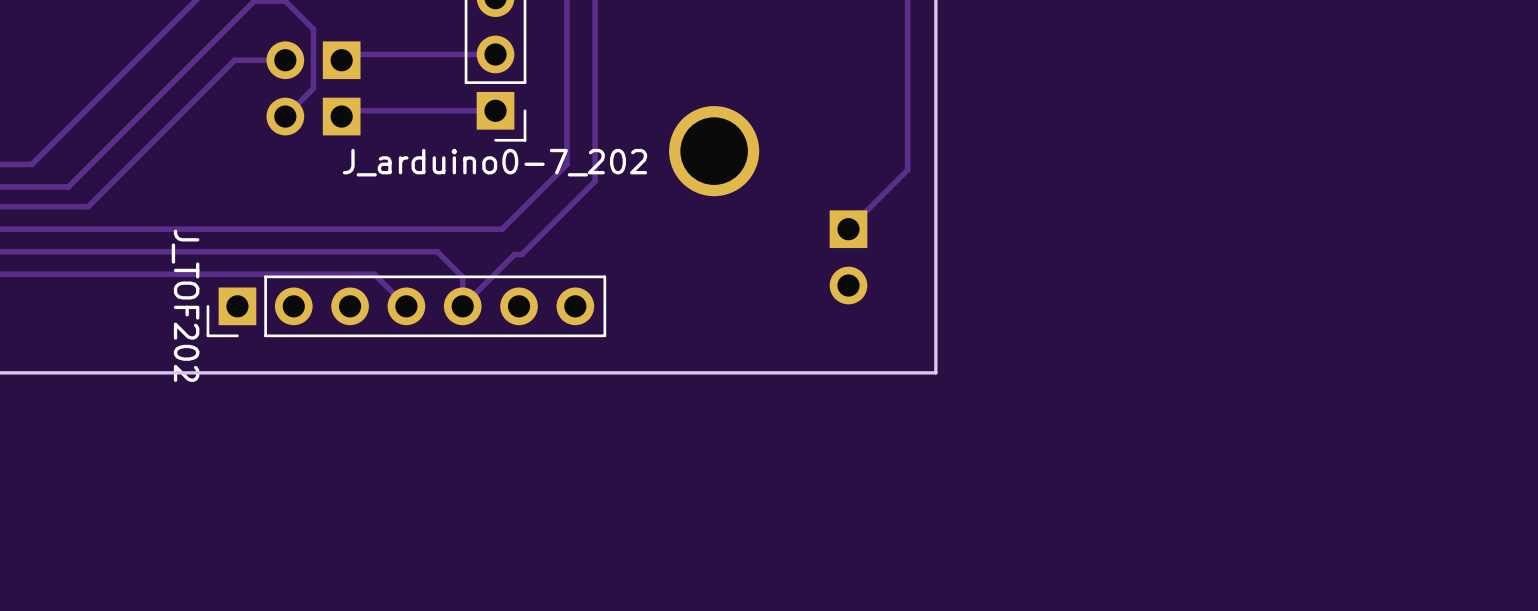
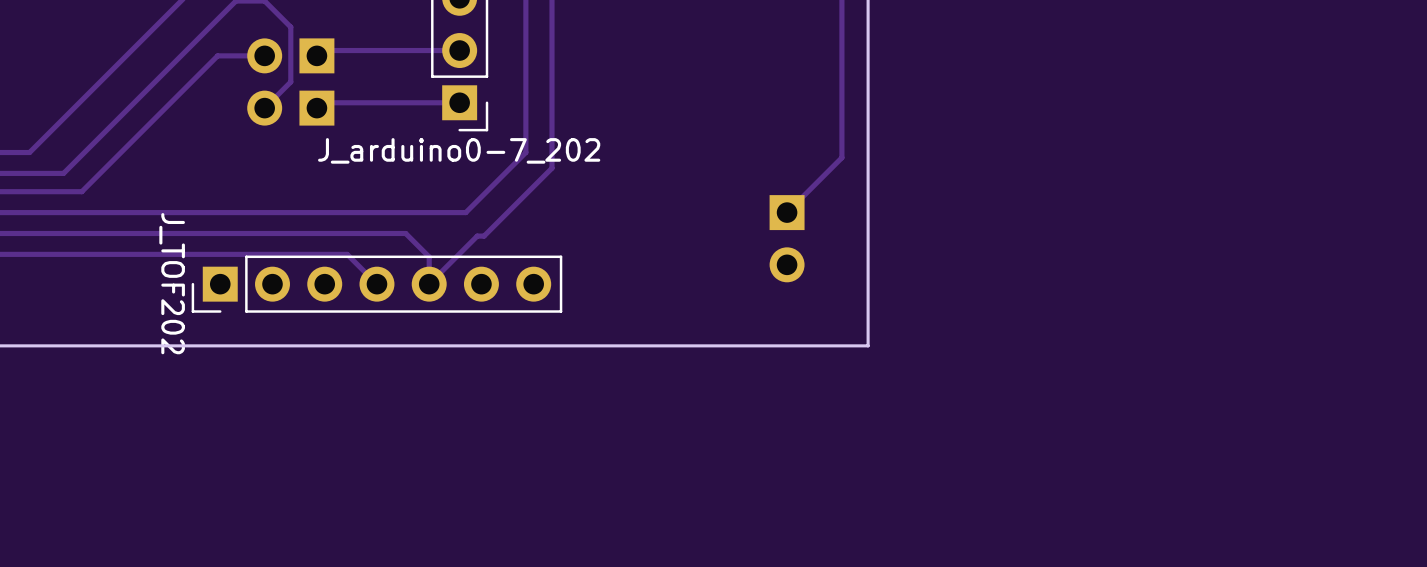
part: (714, 151) -> none

